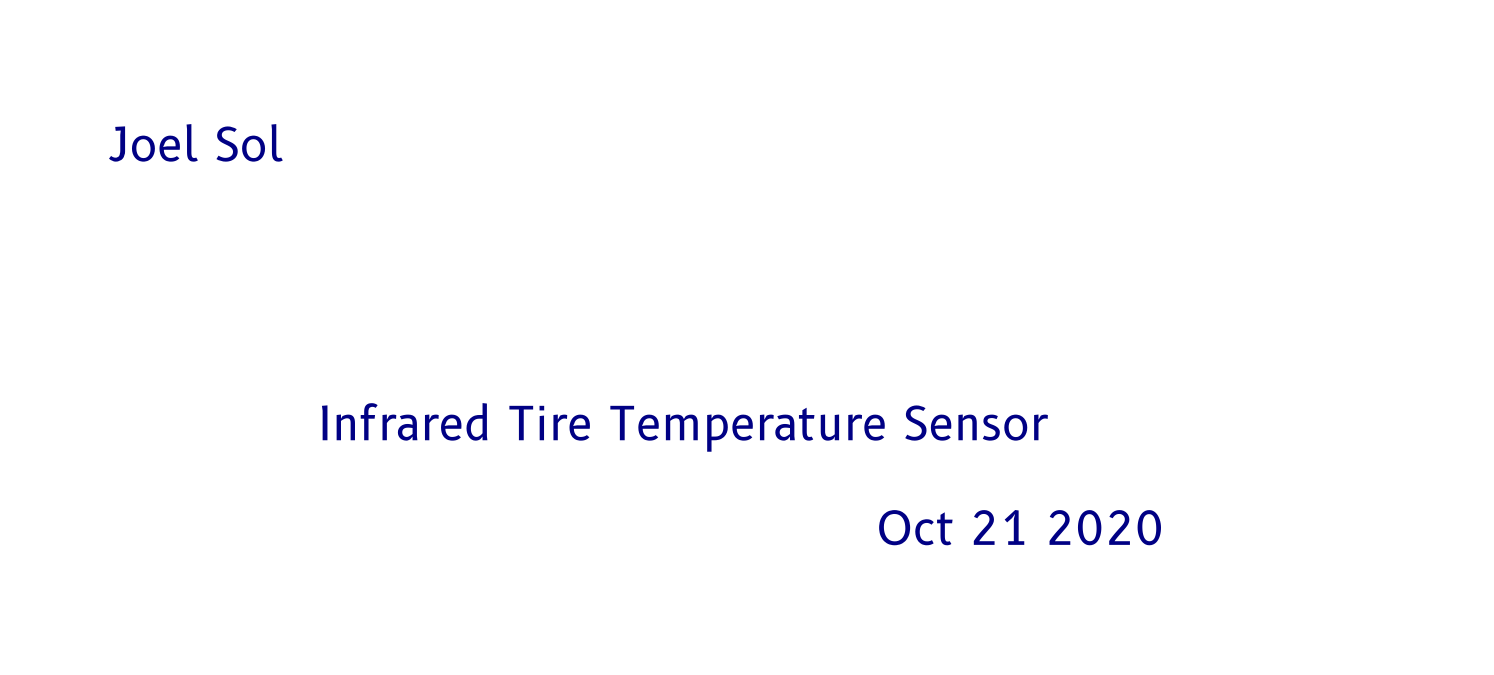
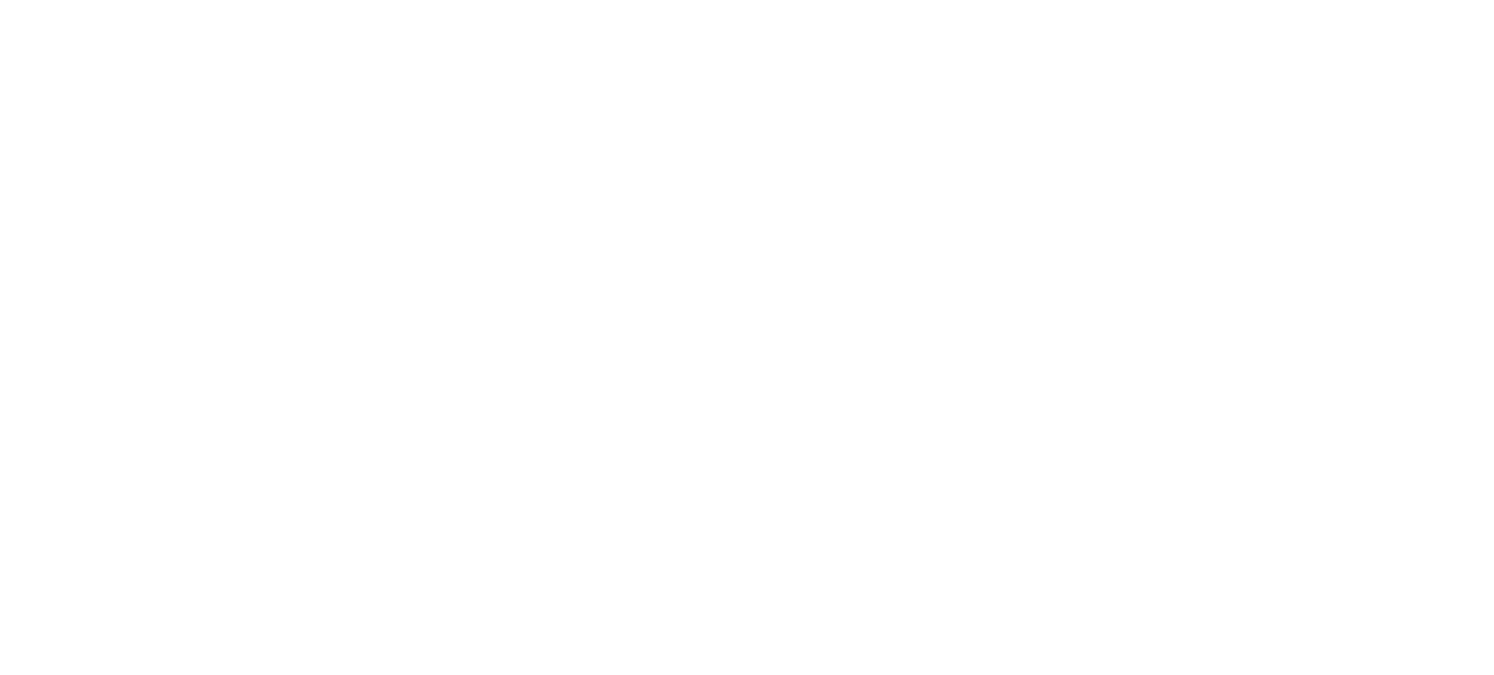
text: Joel Sol (195, 142) -> none
text: Infrared Tire Temperature Sensor (684, 427) -> none
text: Oct 21 2020 (1020, 527) -> none

